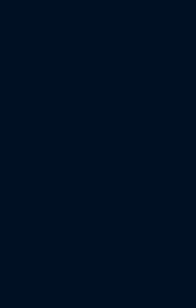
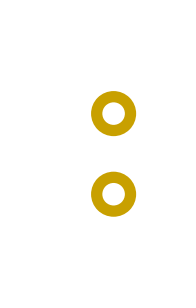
part: none -> (113, 113)
part: none -> (113, 194)

